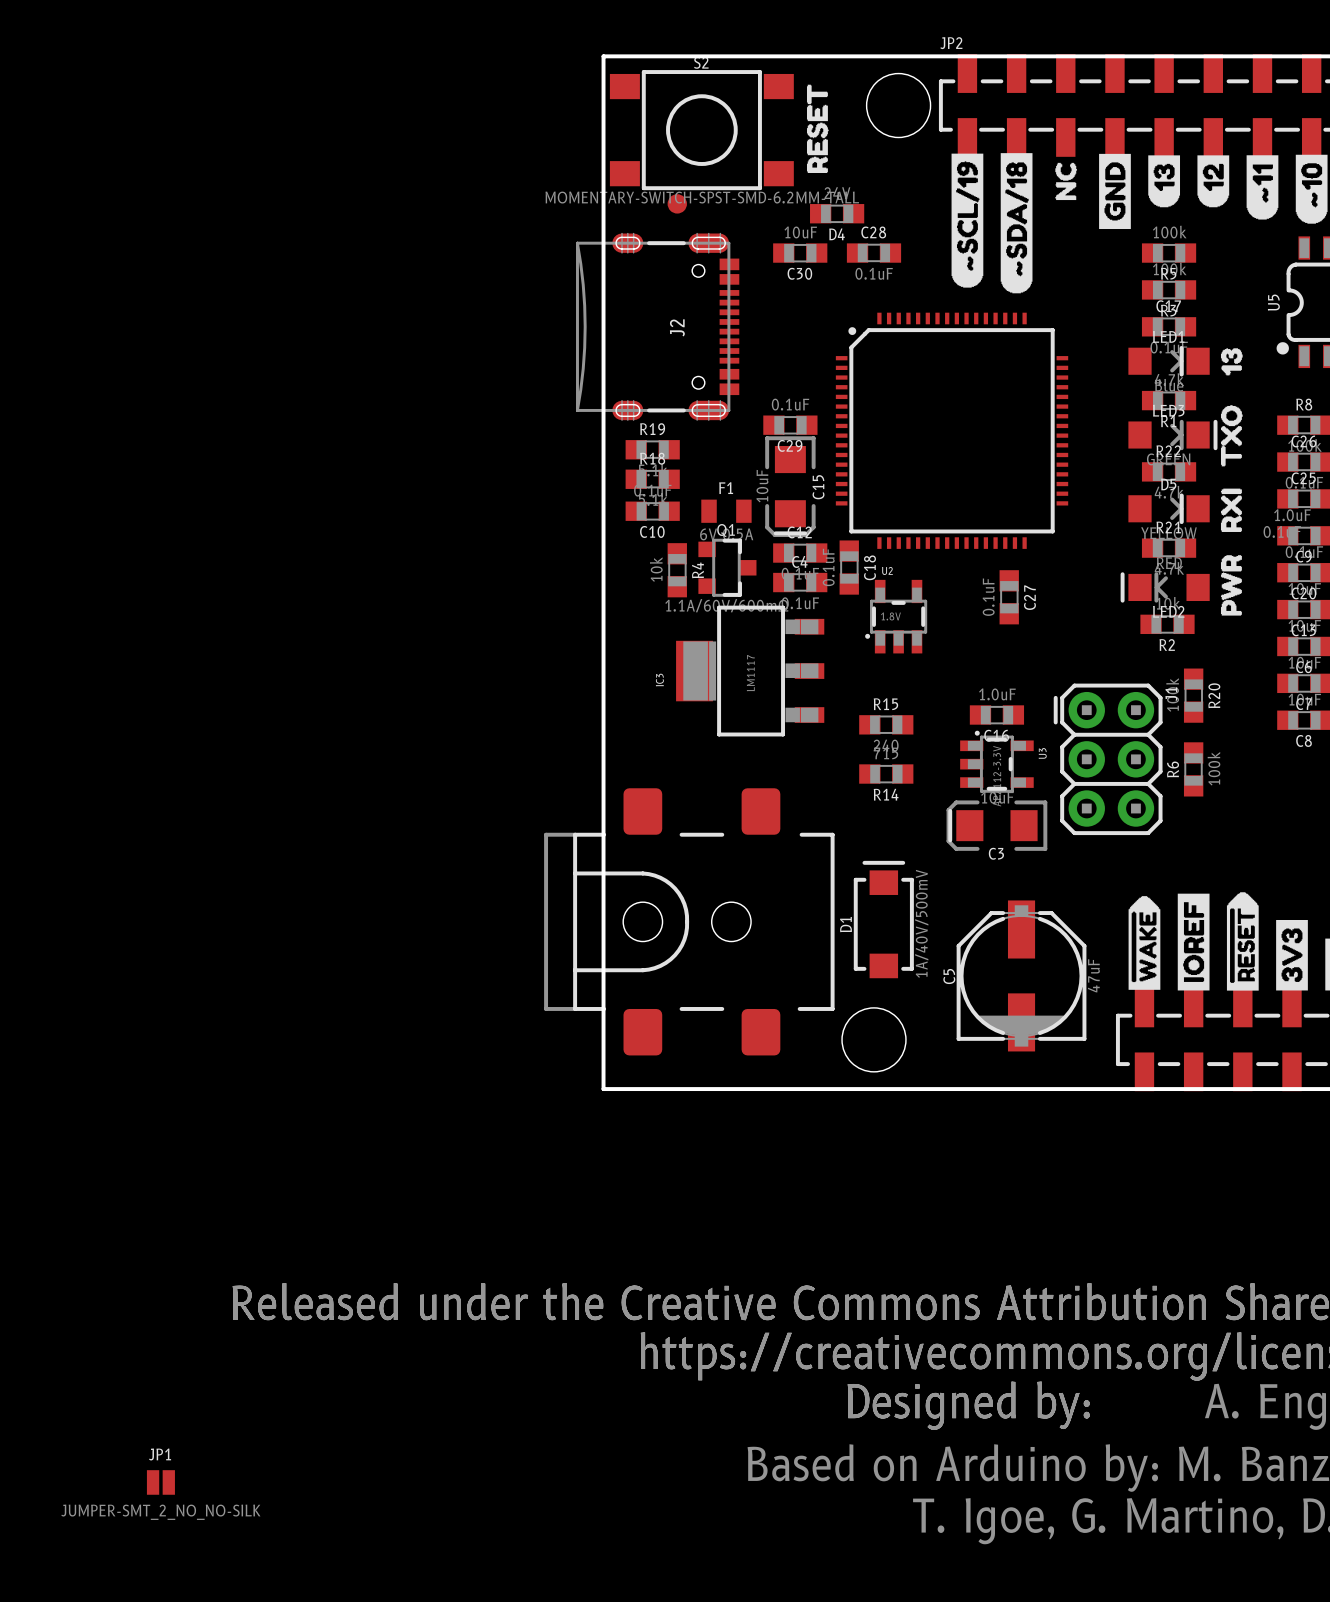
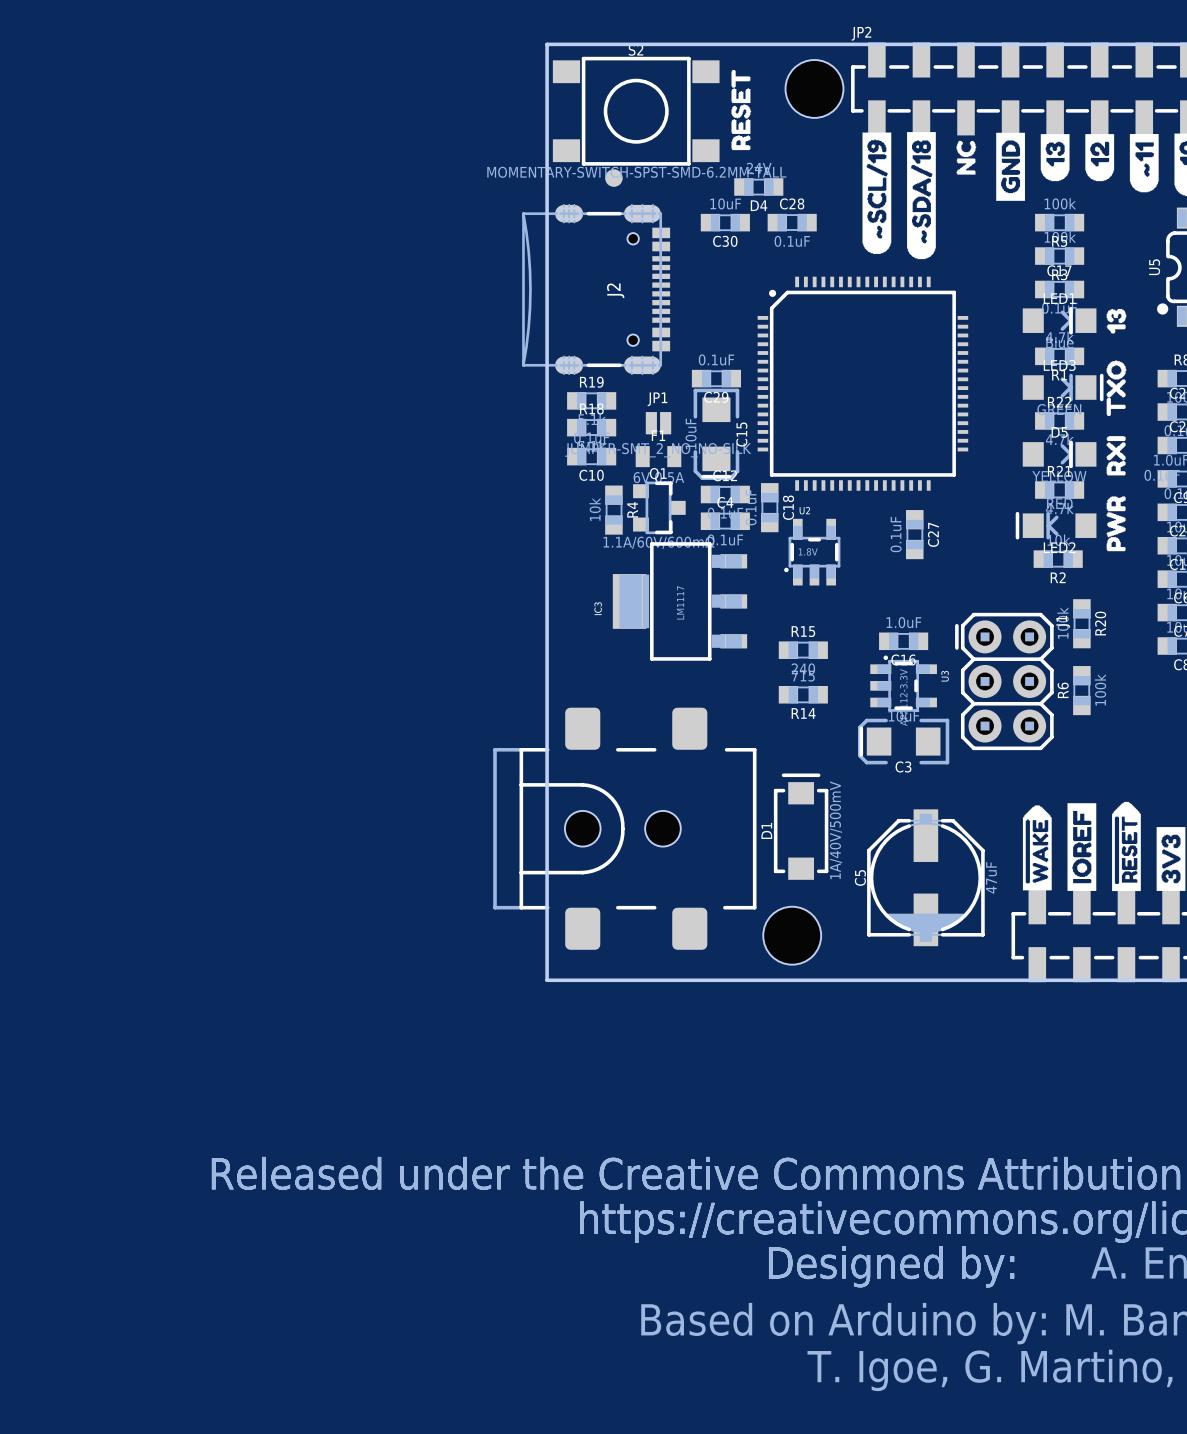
JP1 position: (160, 1482) -> (658, 423)

